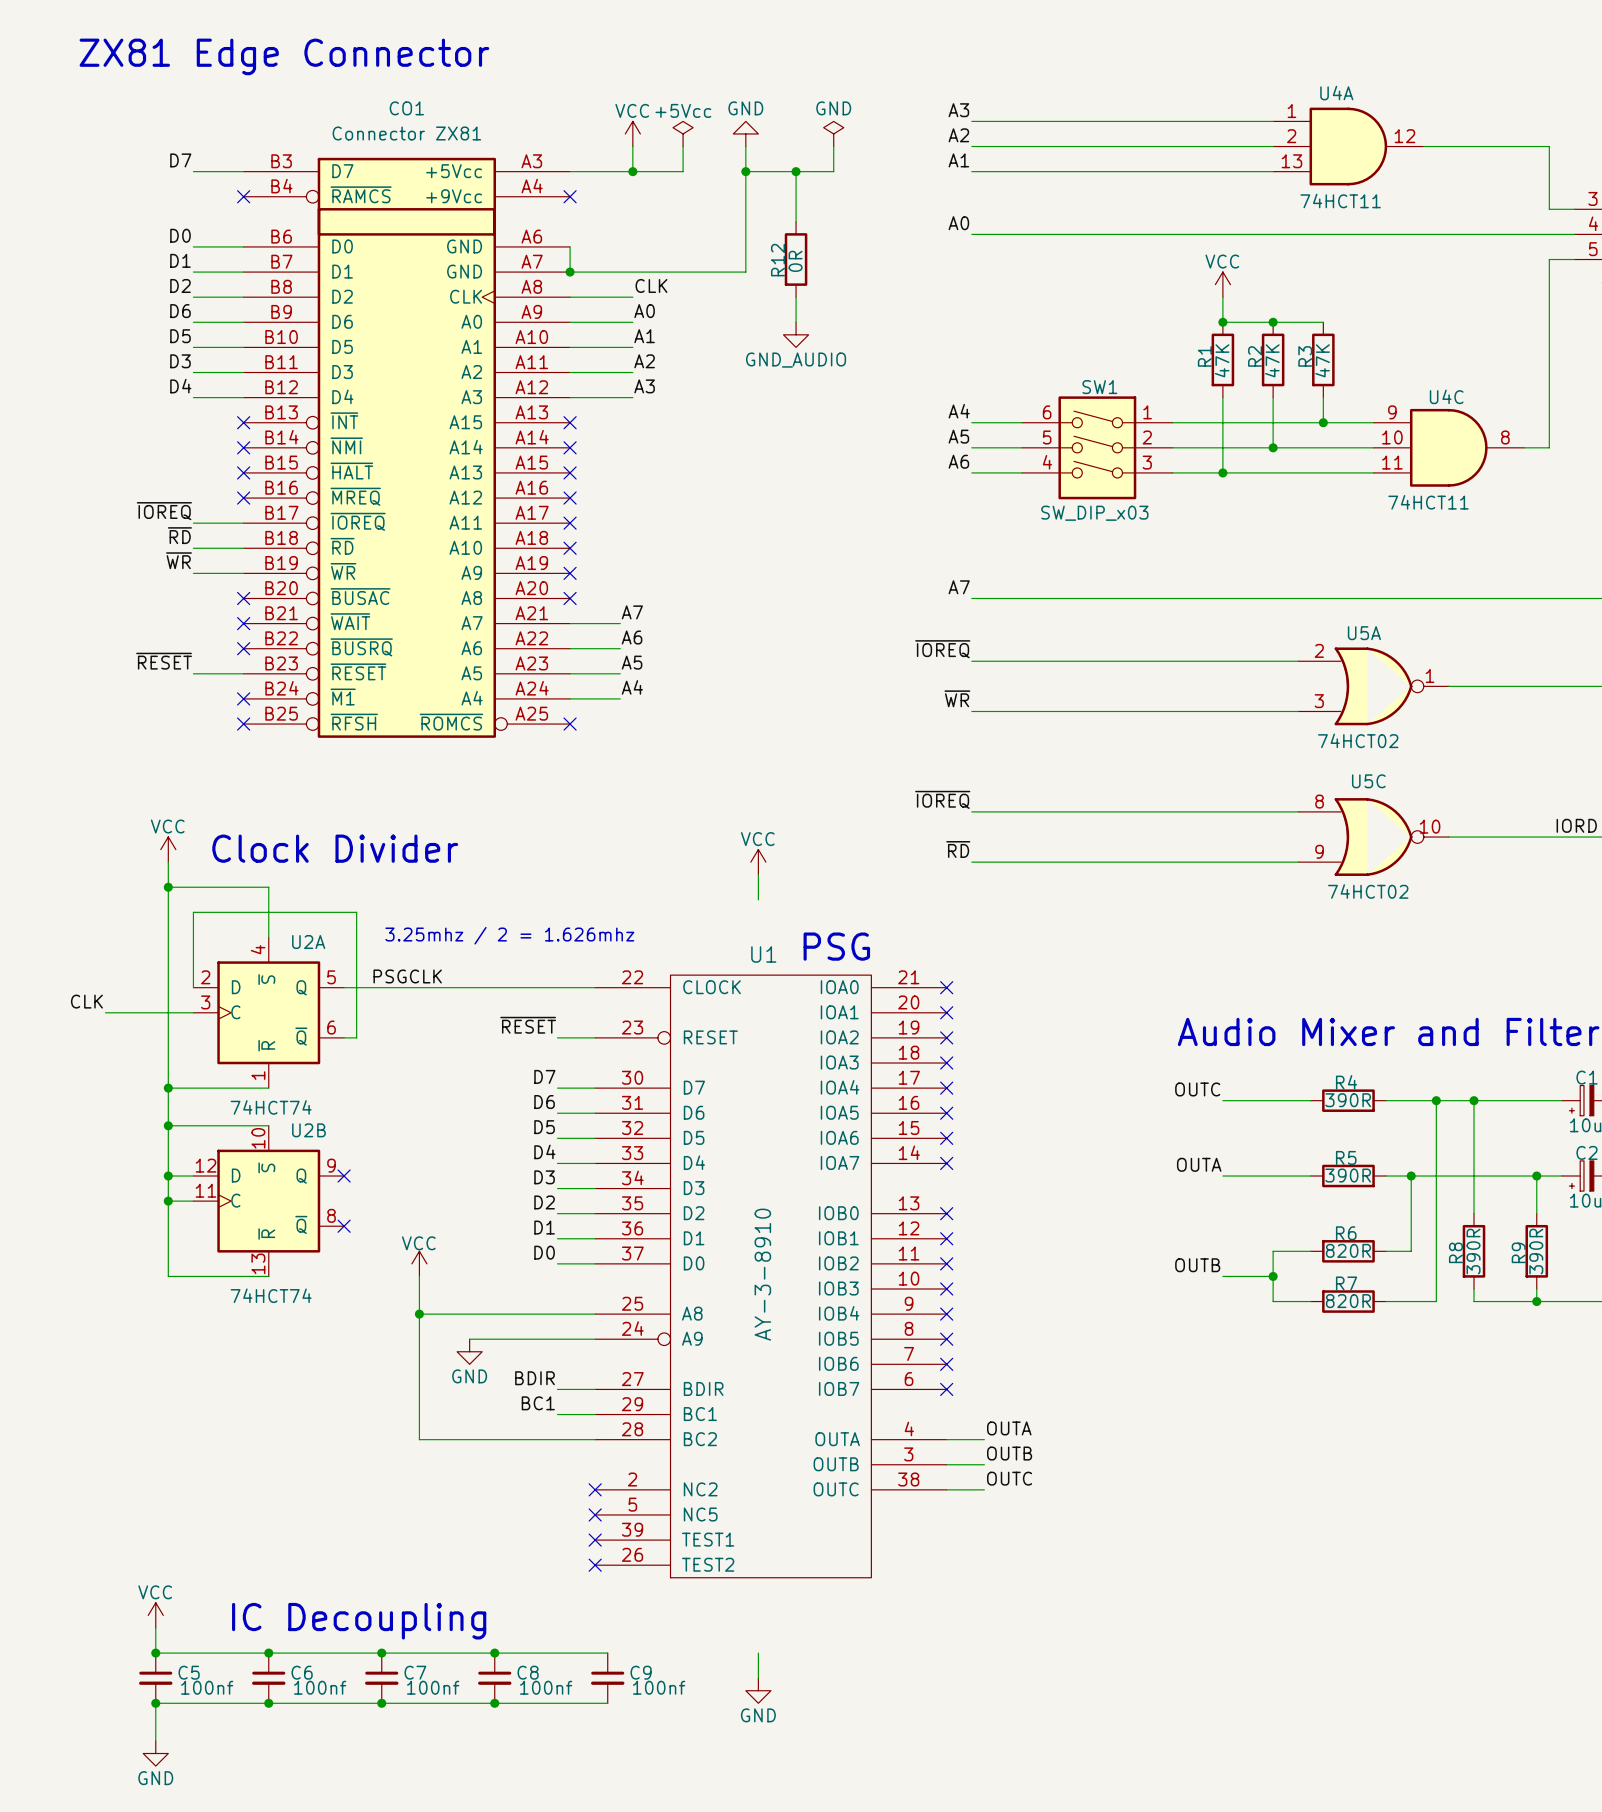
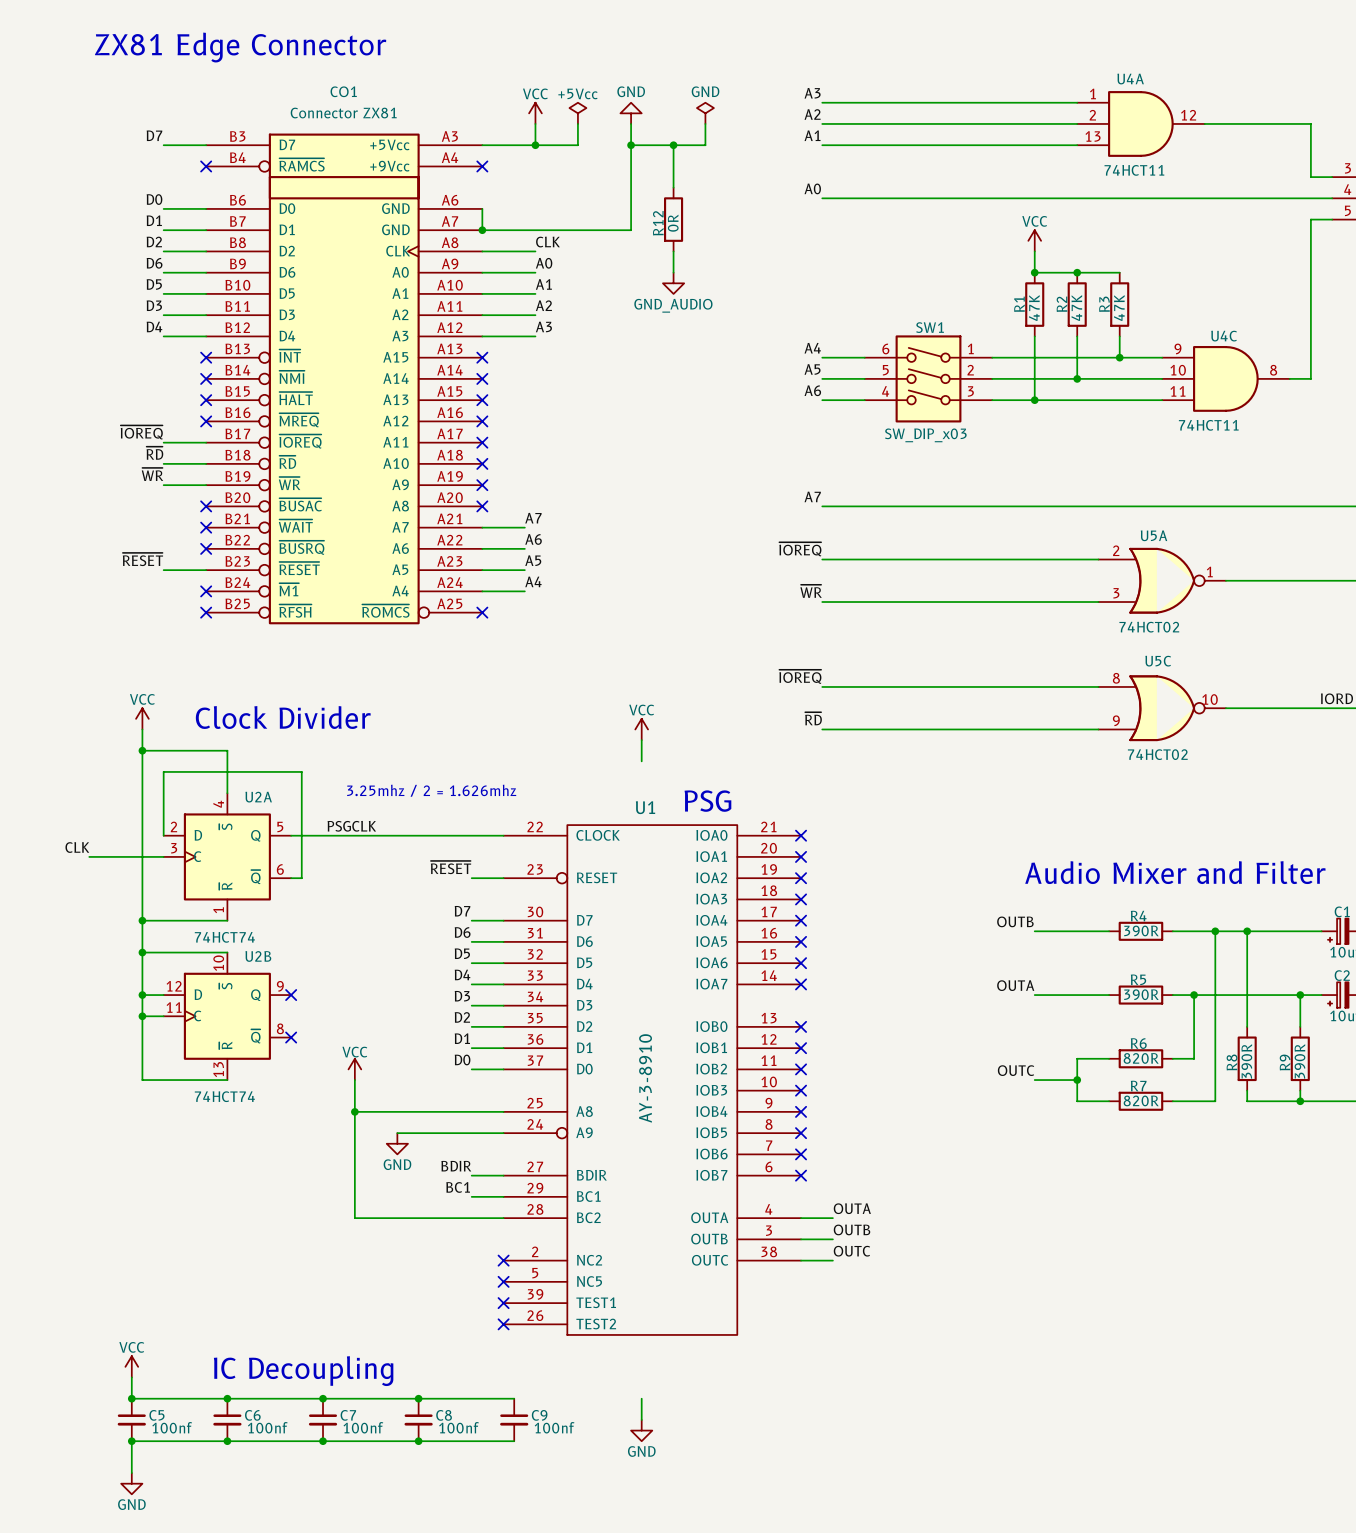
label: OUTC (1197, 1089) -> OUTB (1015, 921)
label: OUTB (1197, 1265) -> OUTC (1016, 1070)

